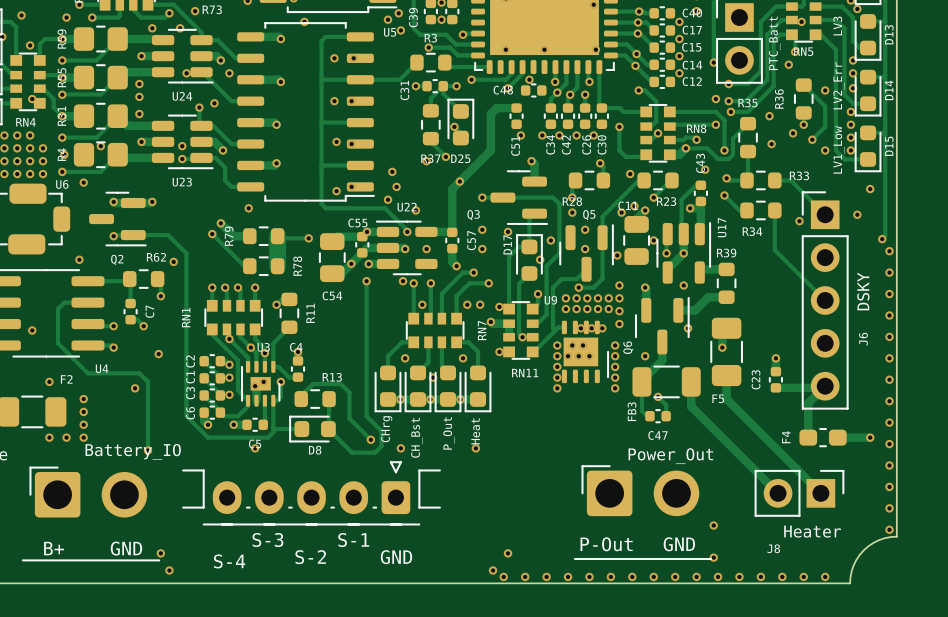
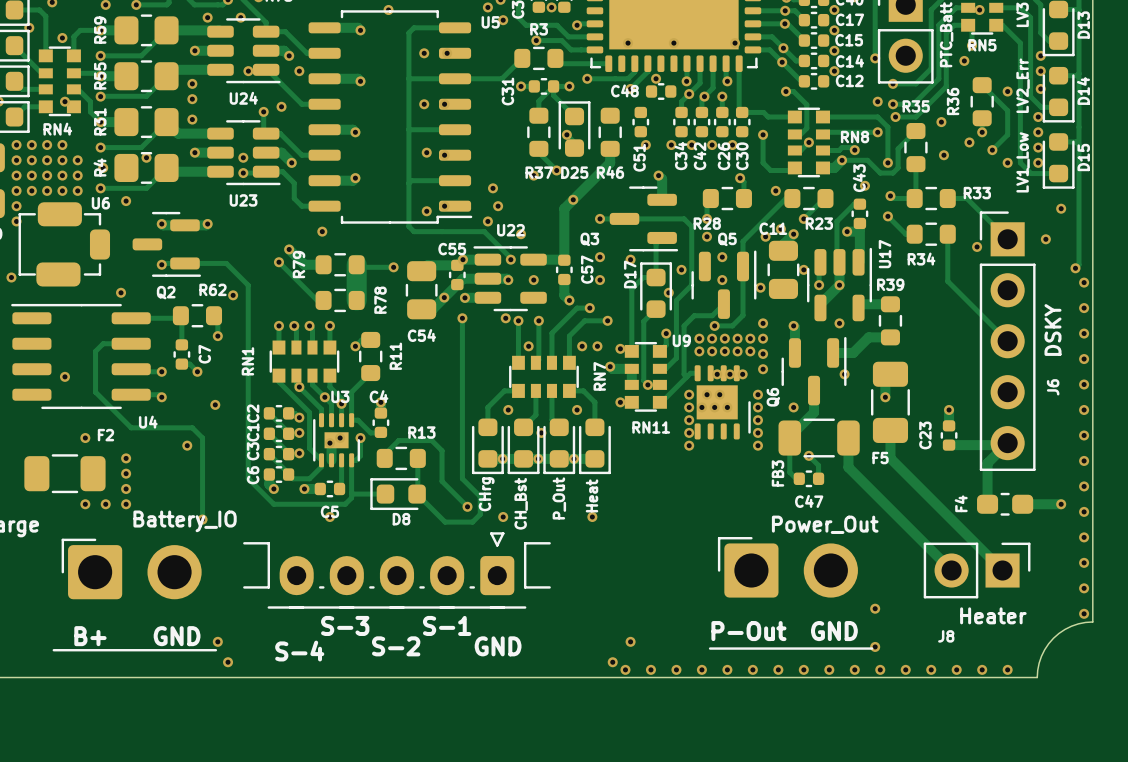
track: (516, 108) (496, 108) (490, 114) (490, 138) -> none
R46: none -> (610, 132)

